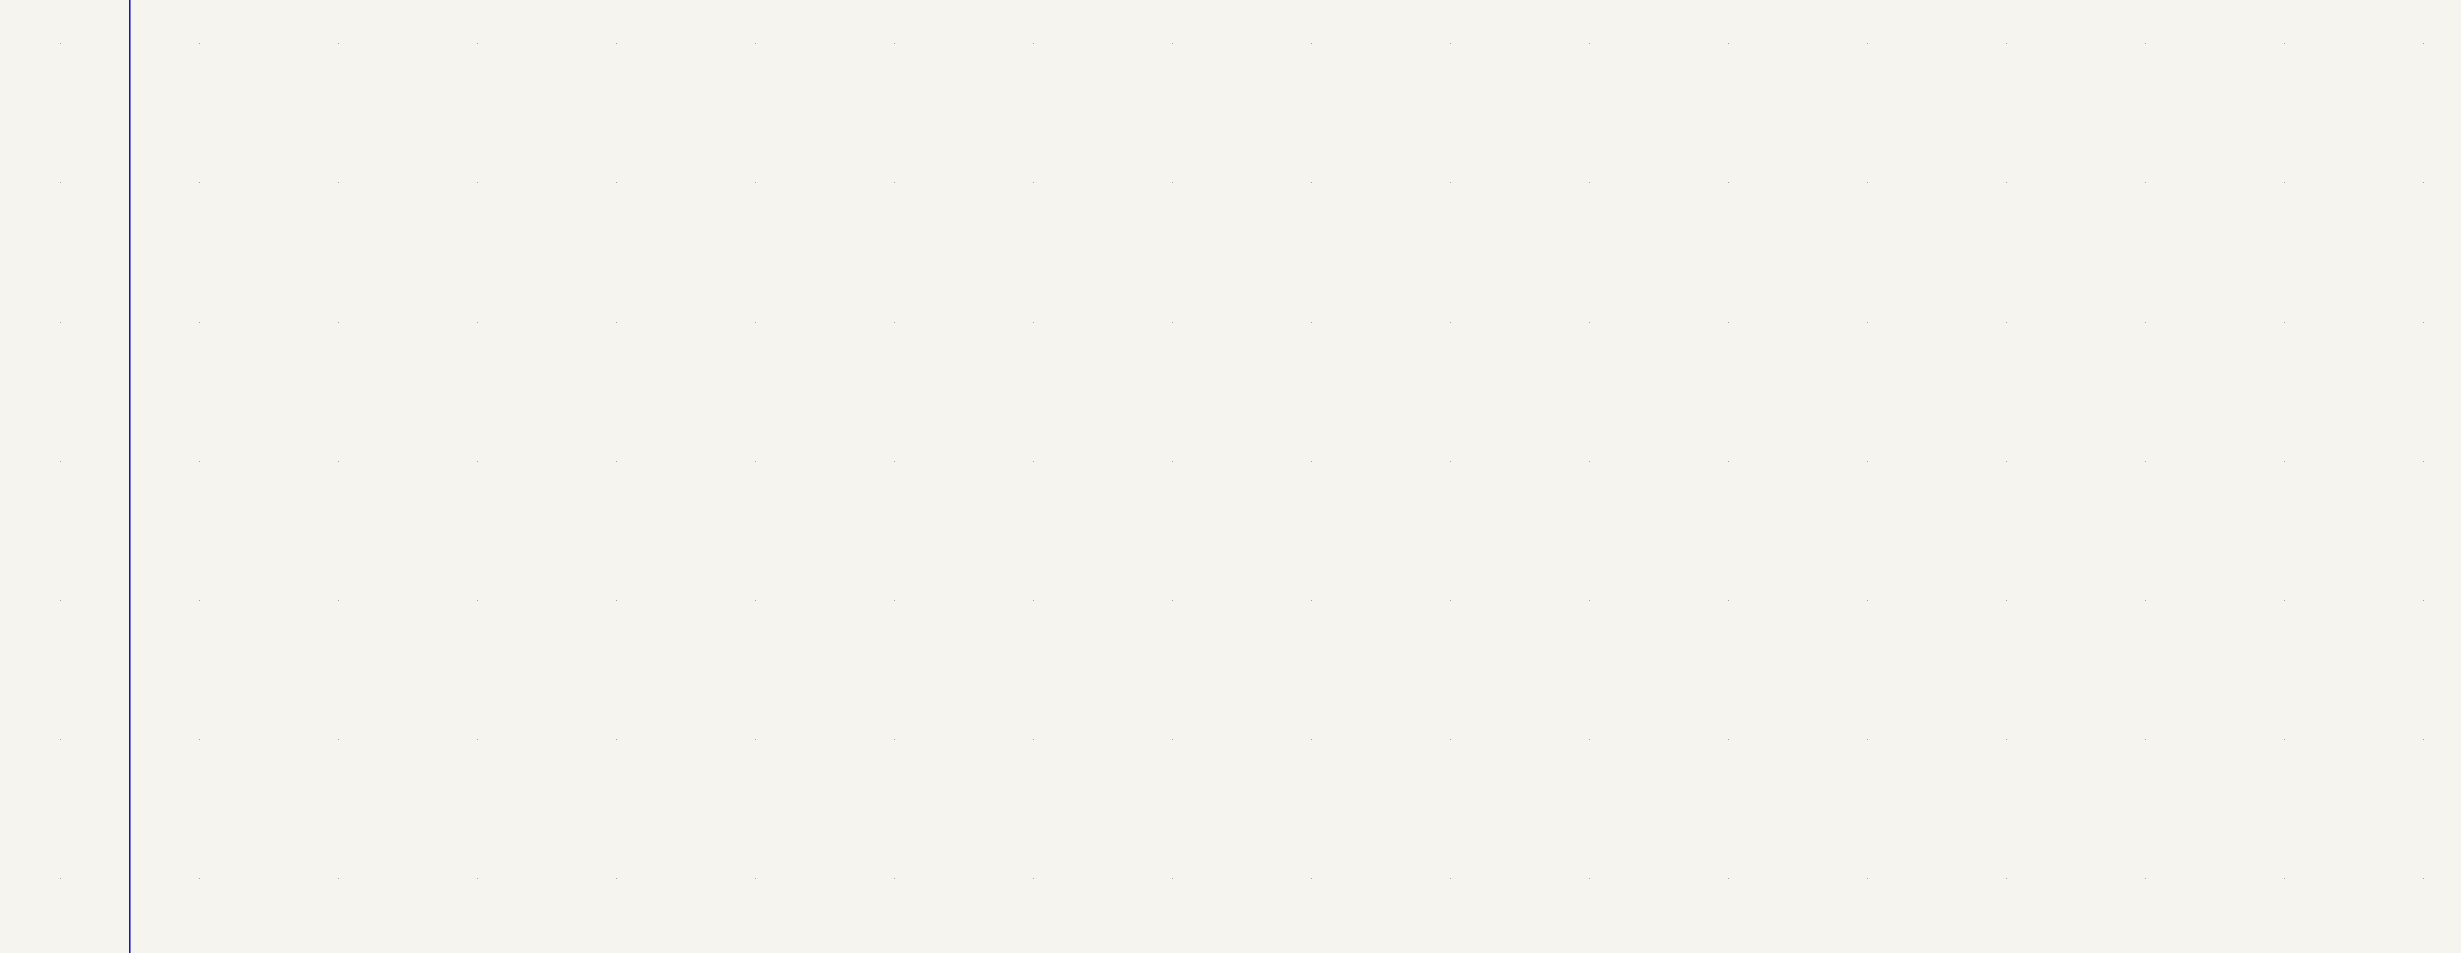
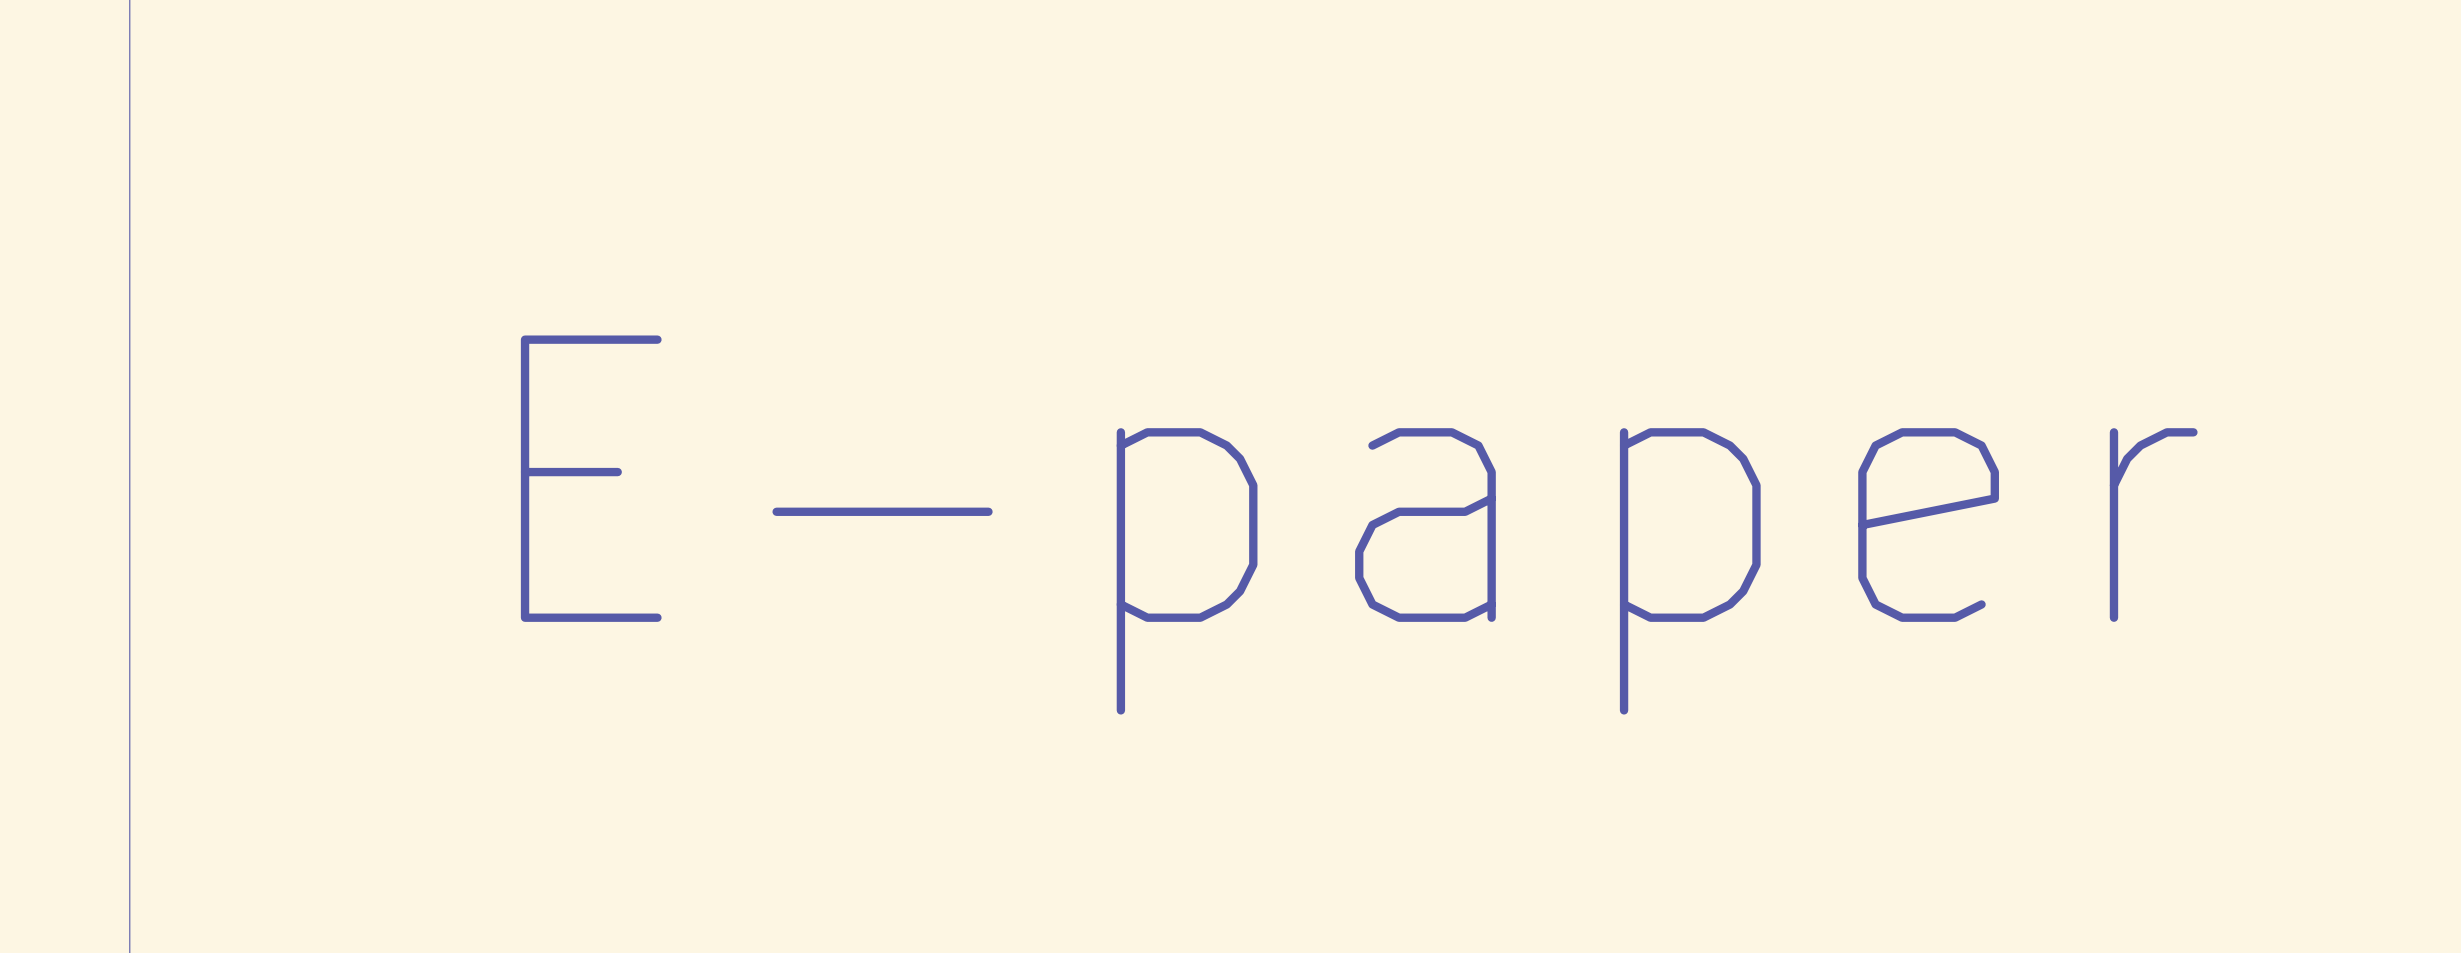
text: none -> E-paper (1359, 525)

